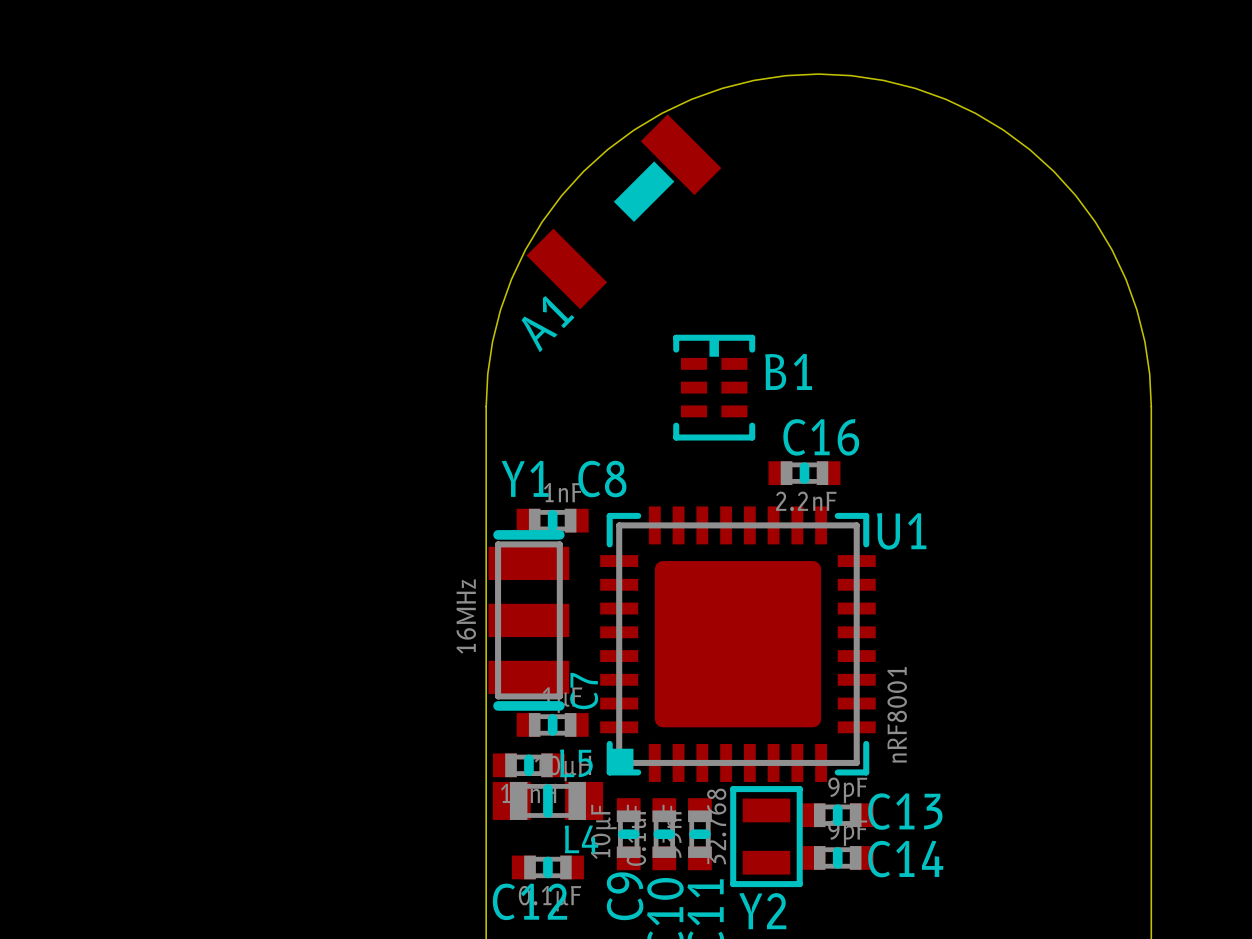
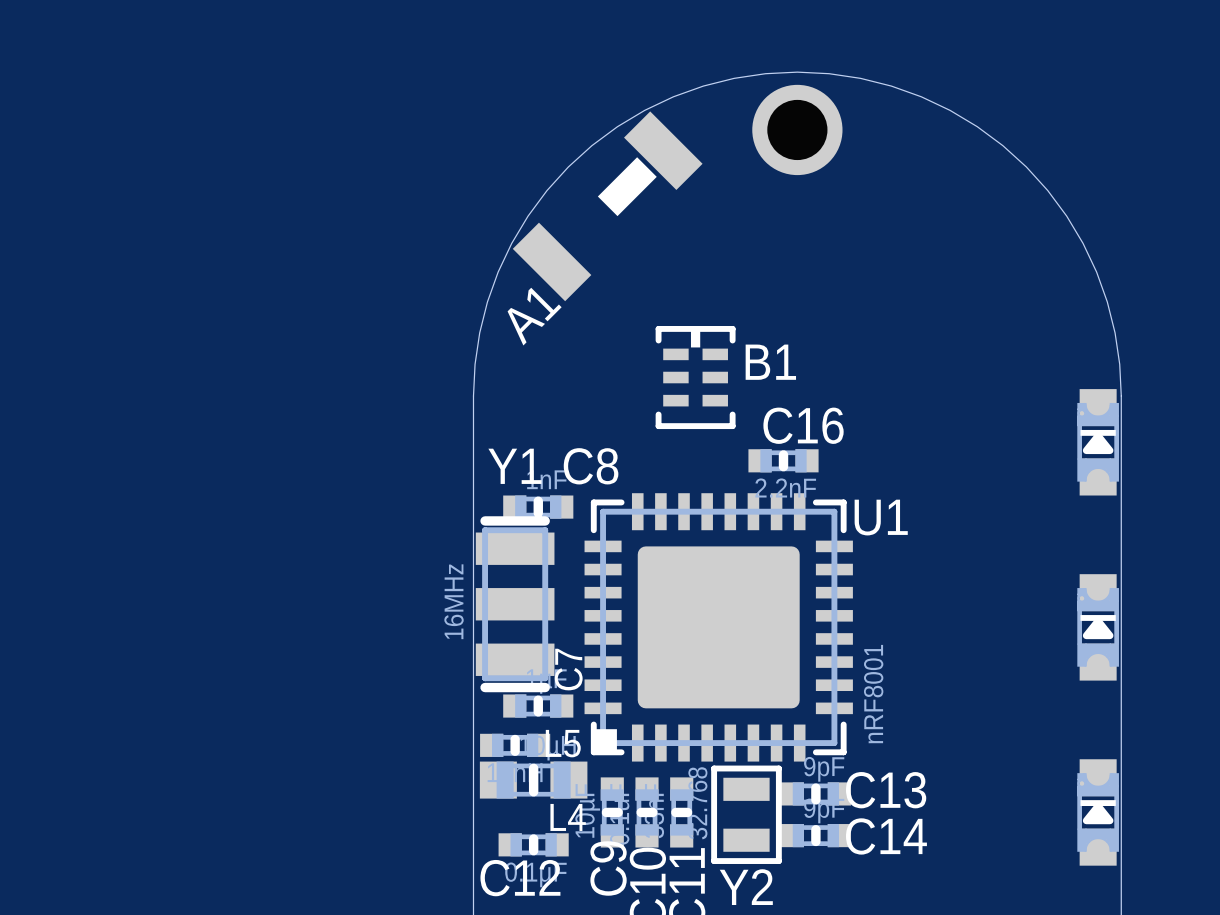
part: none -> (797, 129)
part: none -> (1098, 442)
part: none -> (1098, 627)
part: none -> (1098, 812)

